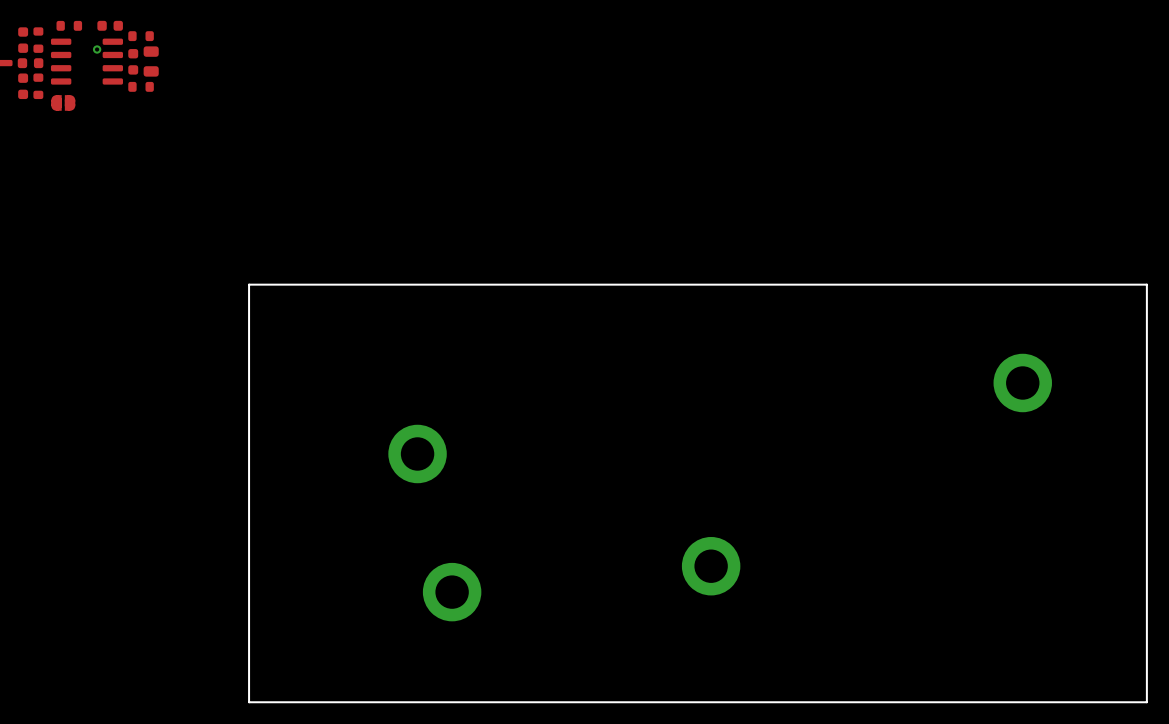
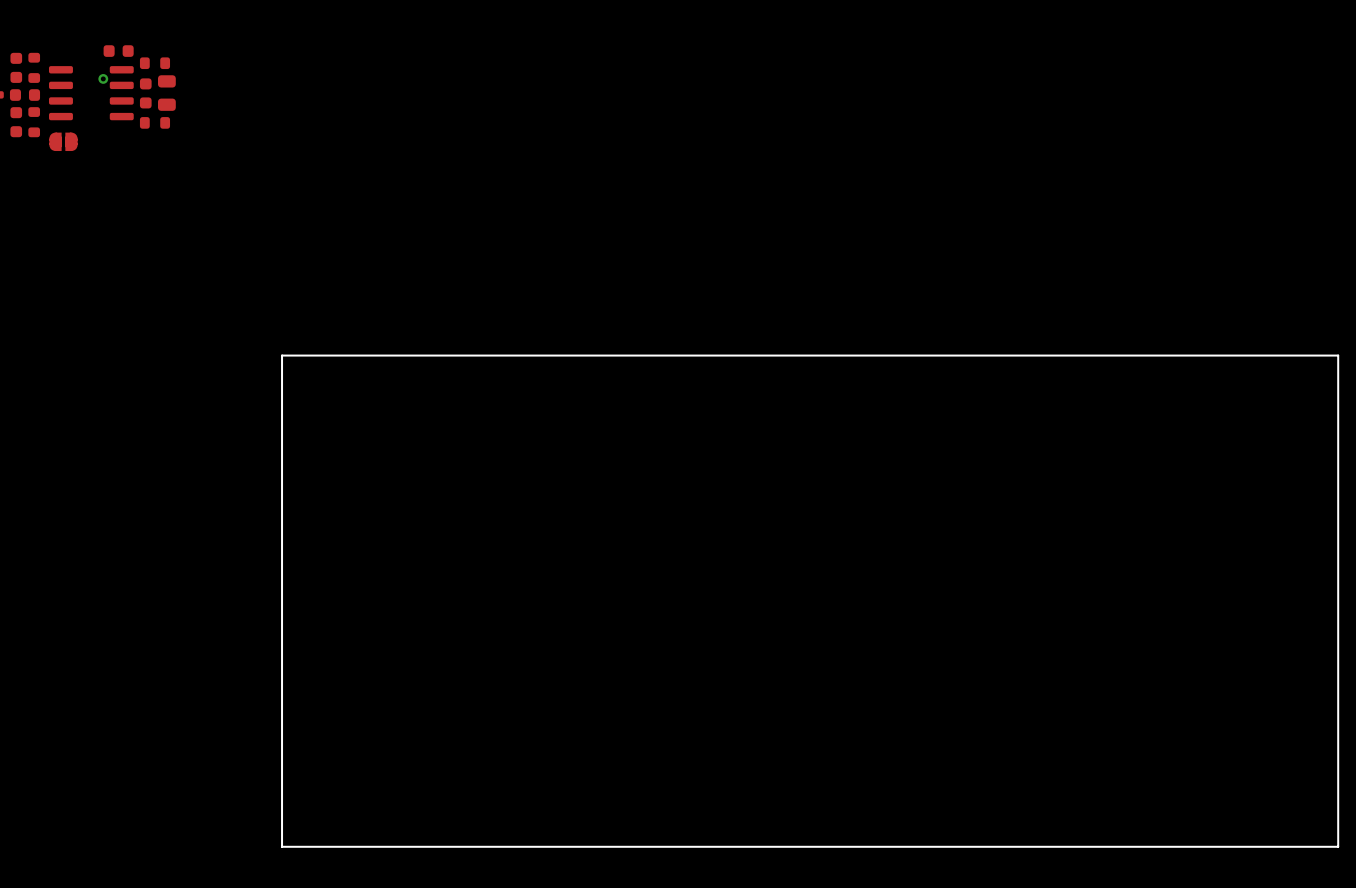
part: (69, 25) -> none
part: (1022, 383) -> none
part: (417, 453) -> none
part: (711, 566) -> none
part: (452, 592) -> none

